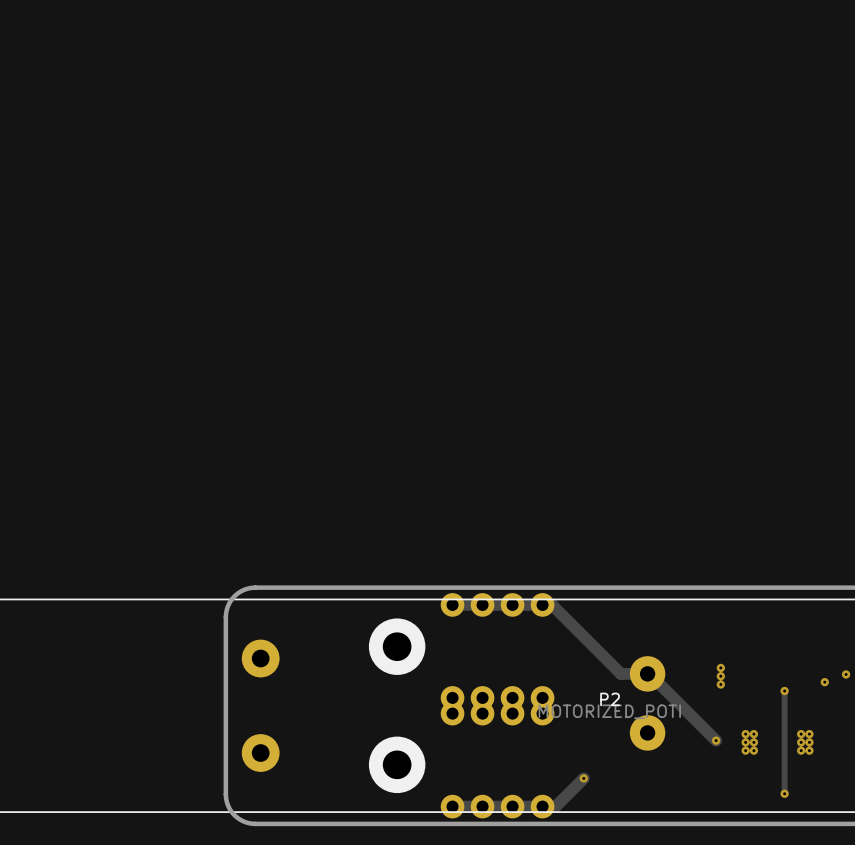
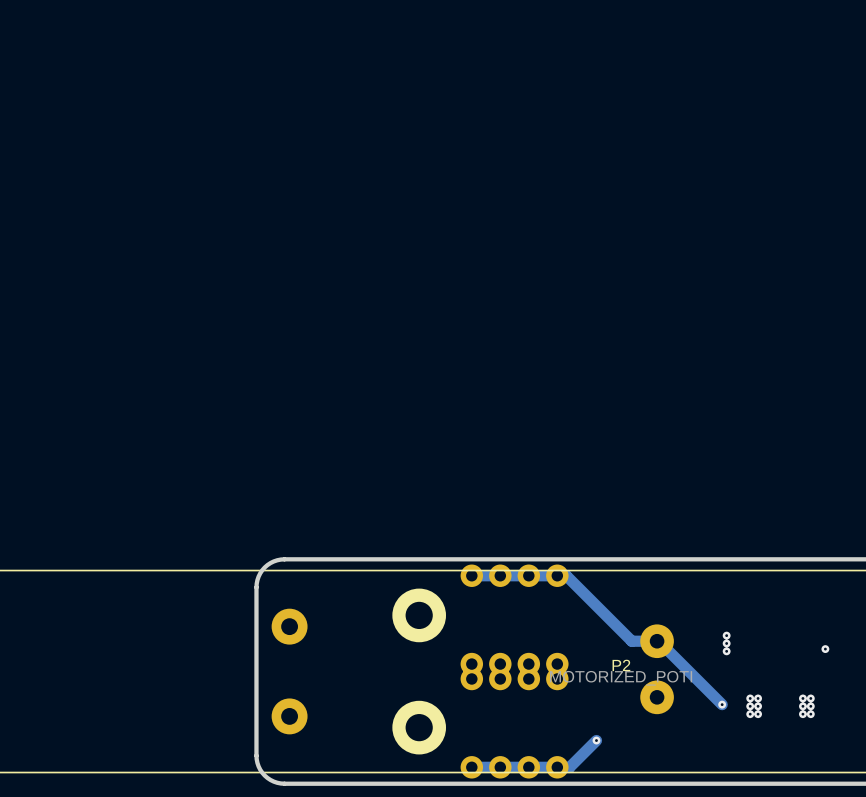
via: (846, 674) -> none
track: (784, 691) (784, 793) -> none
via: (784, 691) -> none
via: (784, 793) -> none

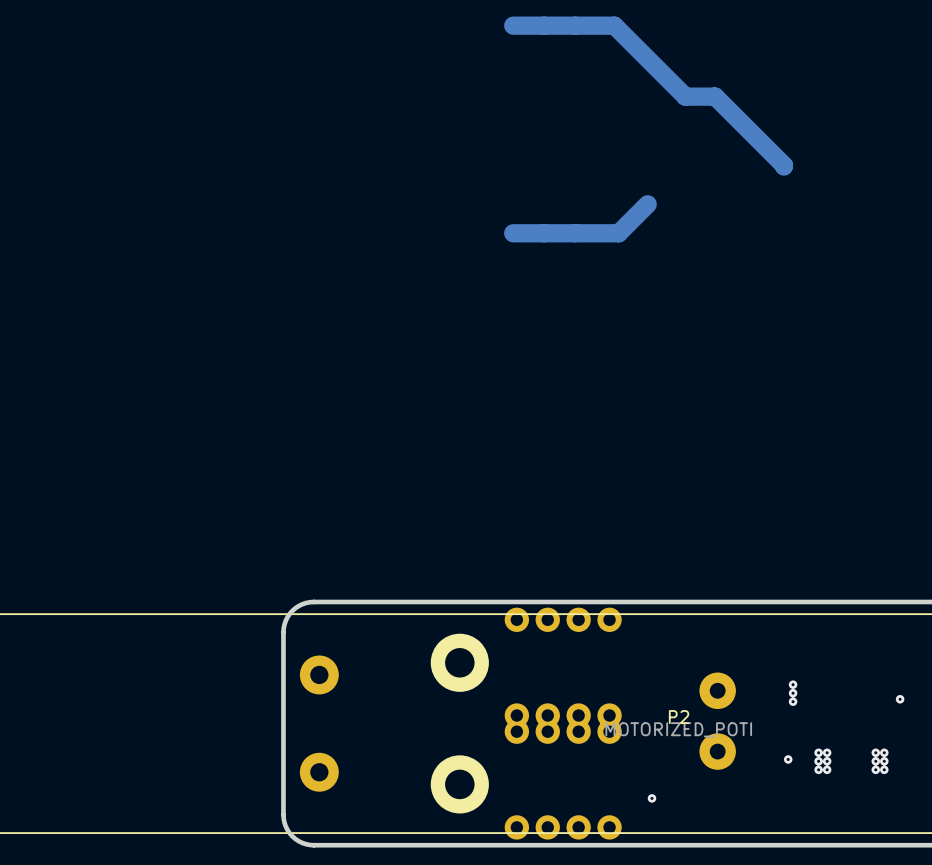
track: none -> (513, 25) (614, 25) (685, 96) (715, 96) (783, 166)
track: none -> (647, 204) (618, 233) (513, 233)
track: (471, 575) (566, 575) (631, 641) (658, 641) (722, 704) -> none
track: (596, 740) (569, 767) (471, 767) -> none

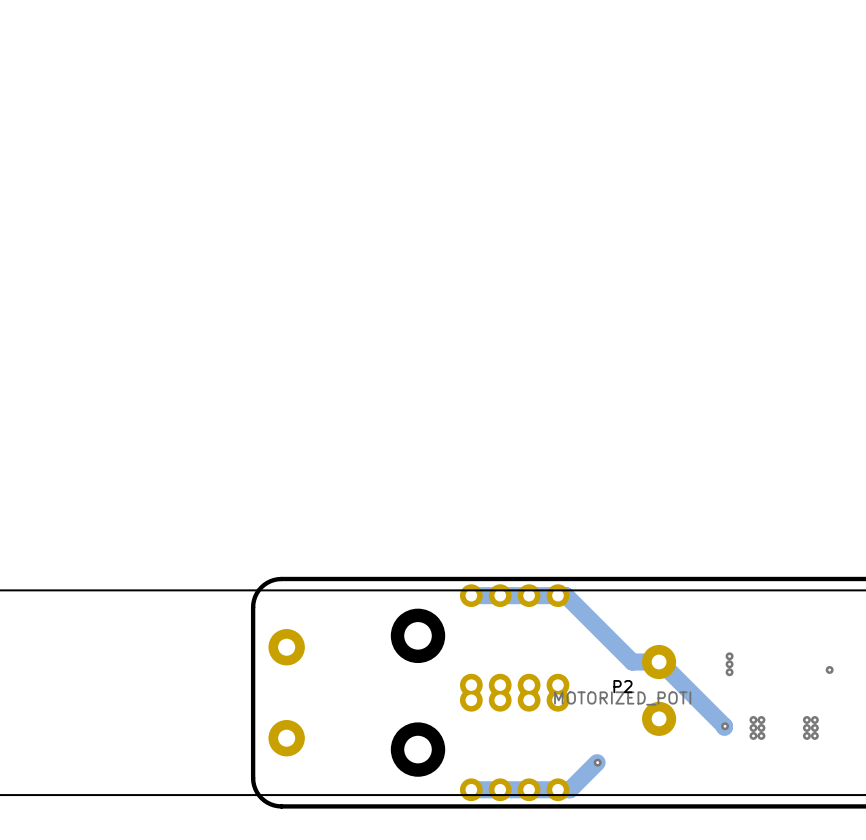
track: (513, 25) (614, 25) (685, 96) (715, 96) (783, 166) -> none
track: (647, 204) (618, 233) (513, 233) -> none
track: none -> (471, 595) (566, 595) (632, 662) (660, 662) (724, 727)
track: none -> (597, 762) (569, 789) (471, 789)

